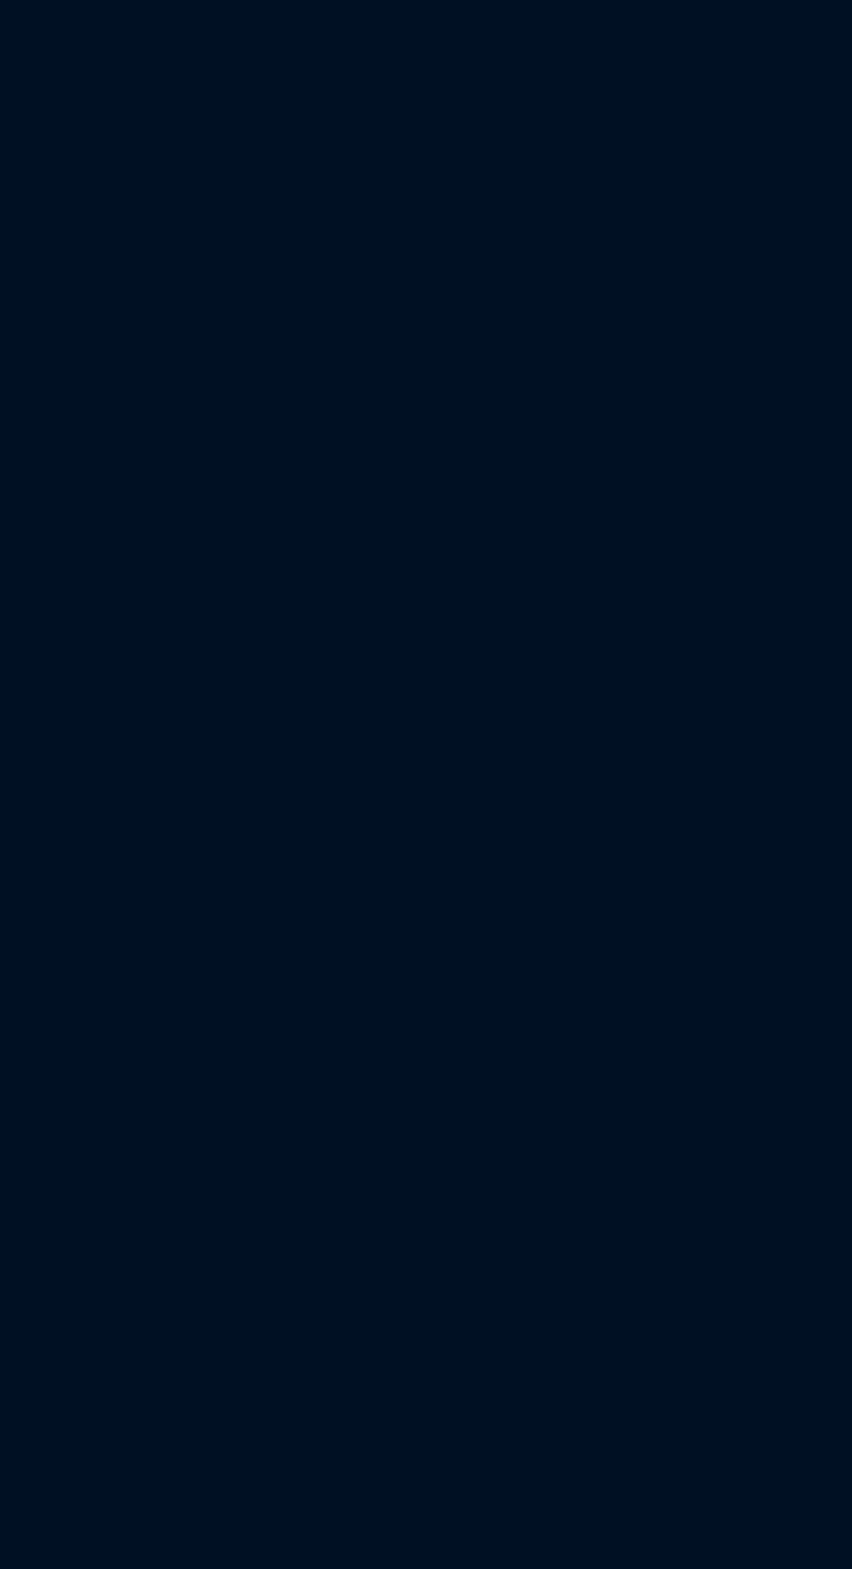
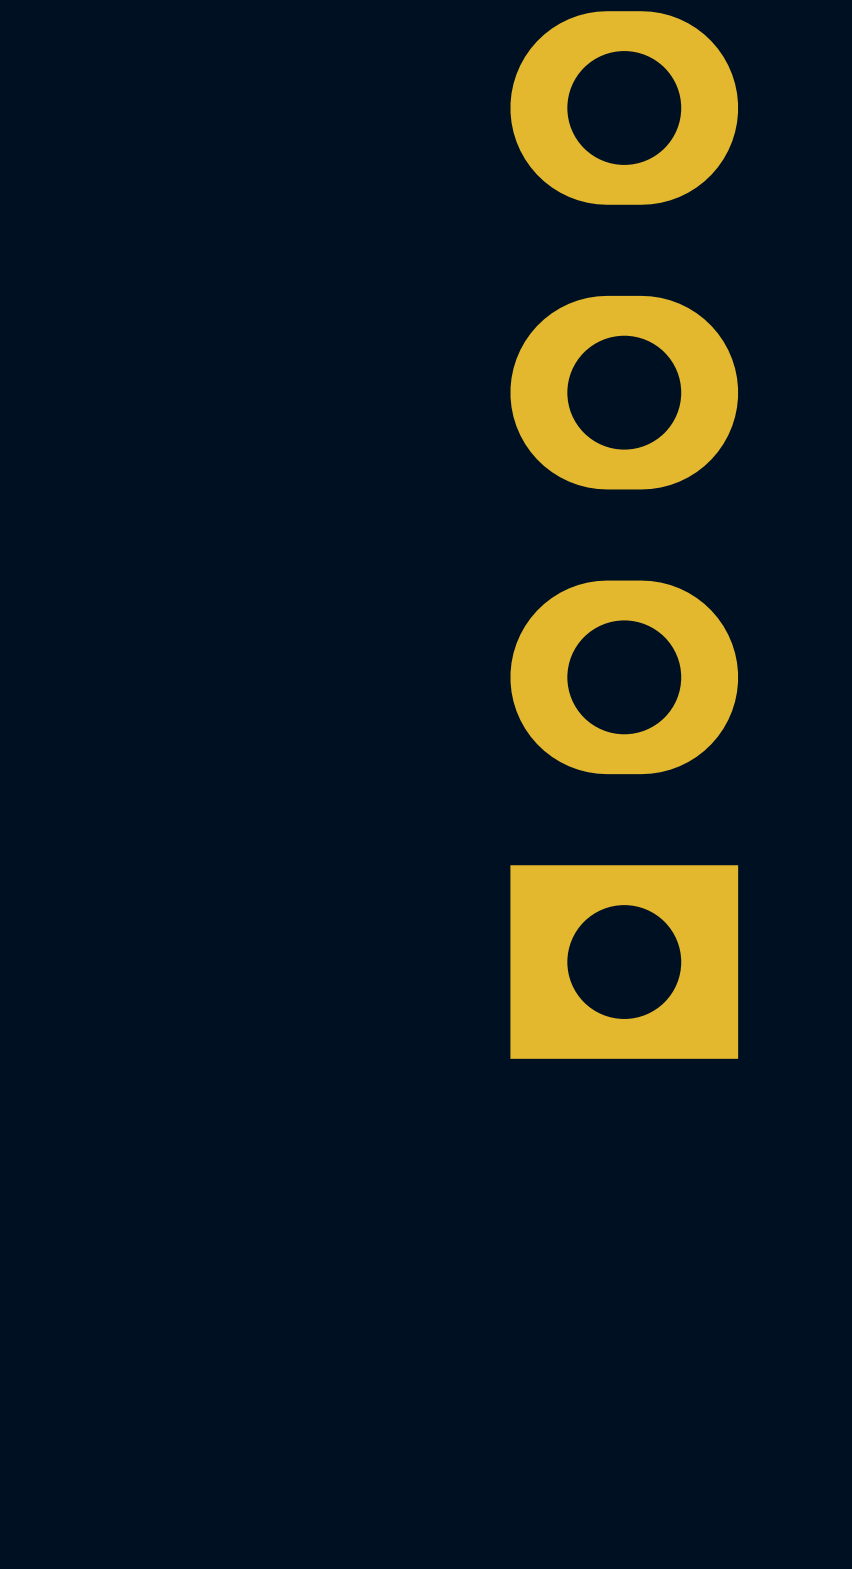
part: none -> (624, 535)

